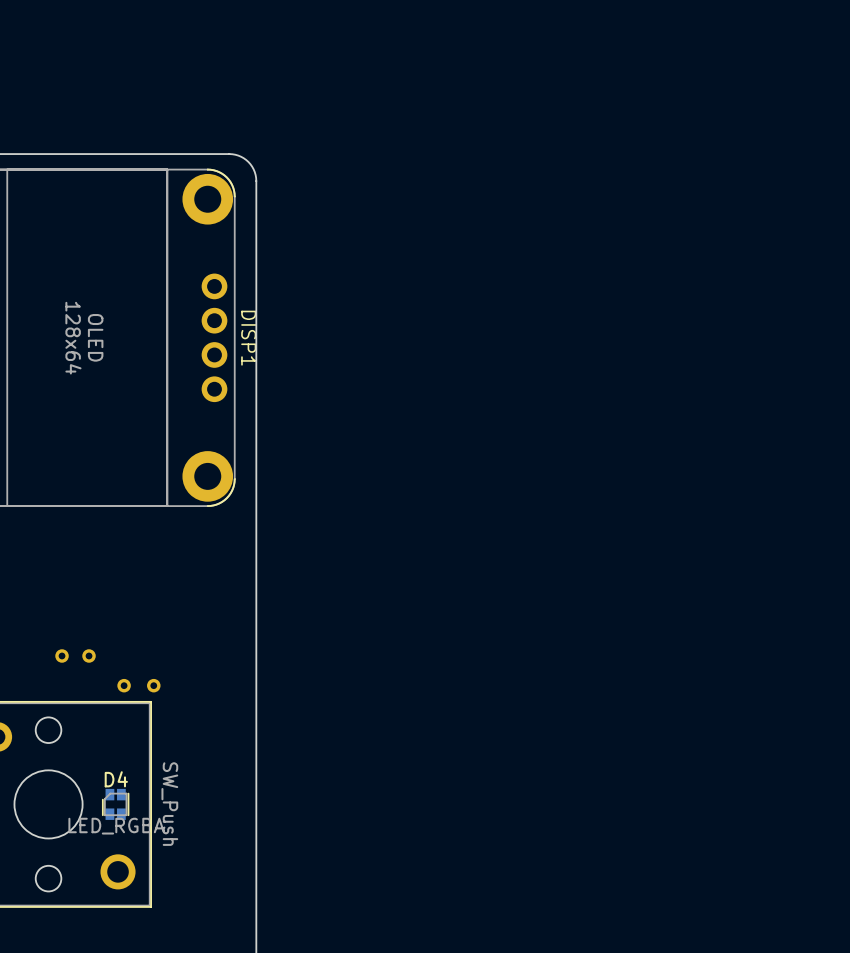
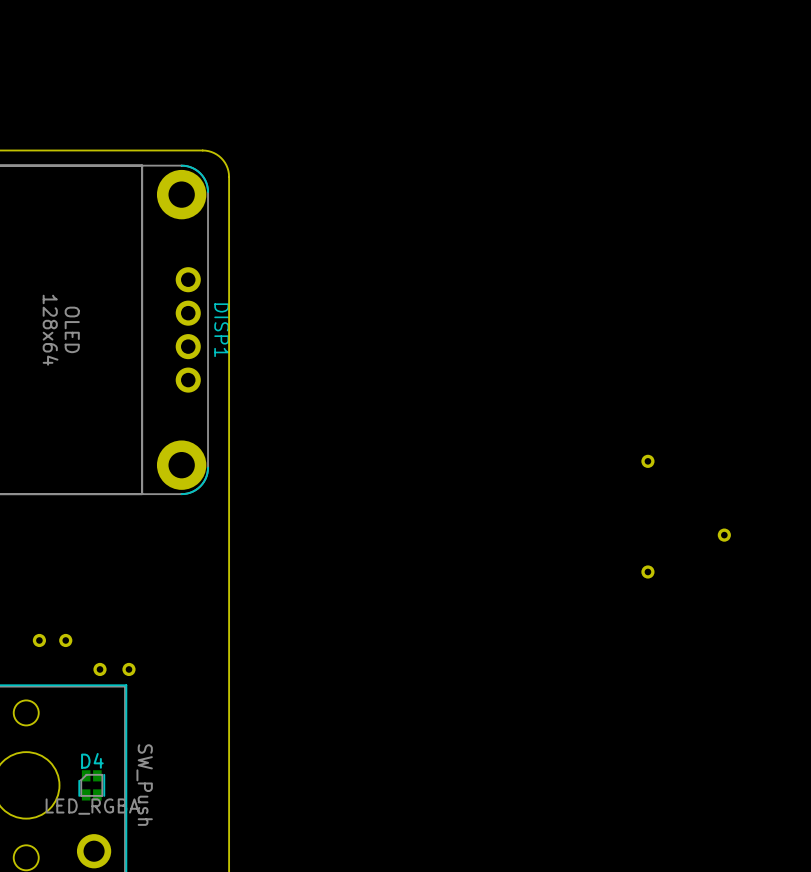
part: none -> (647, 461)
part: none -> (724, 535)
part: none -> (647, 571)

